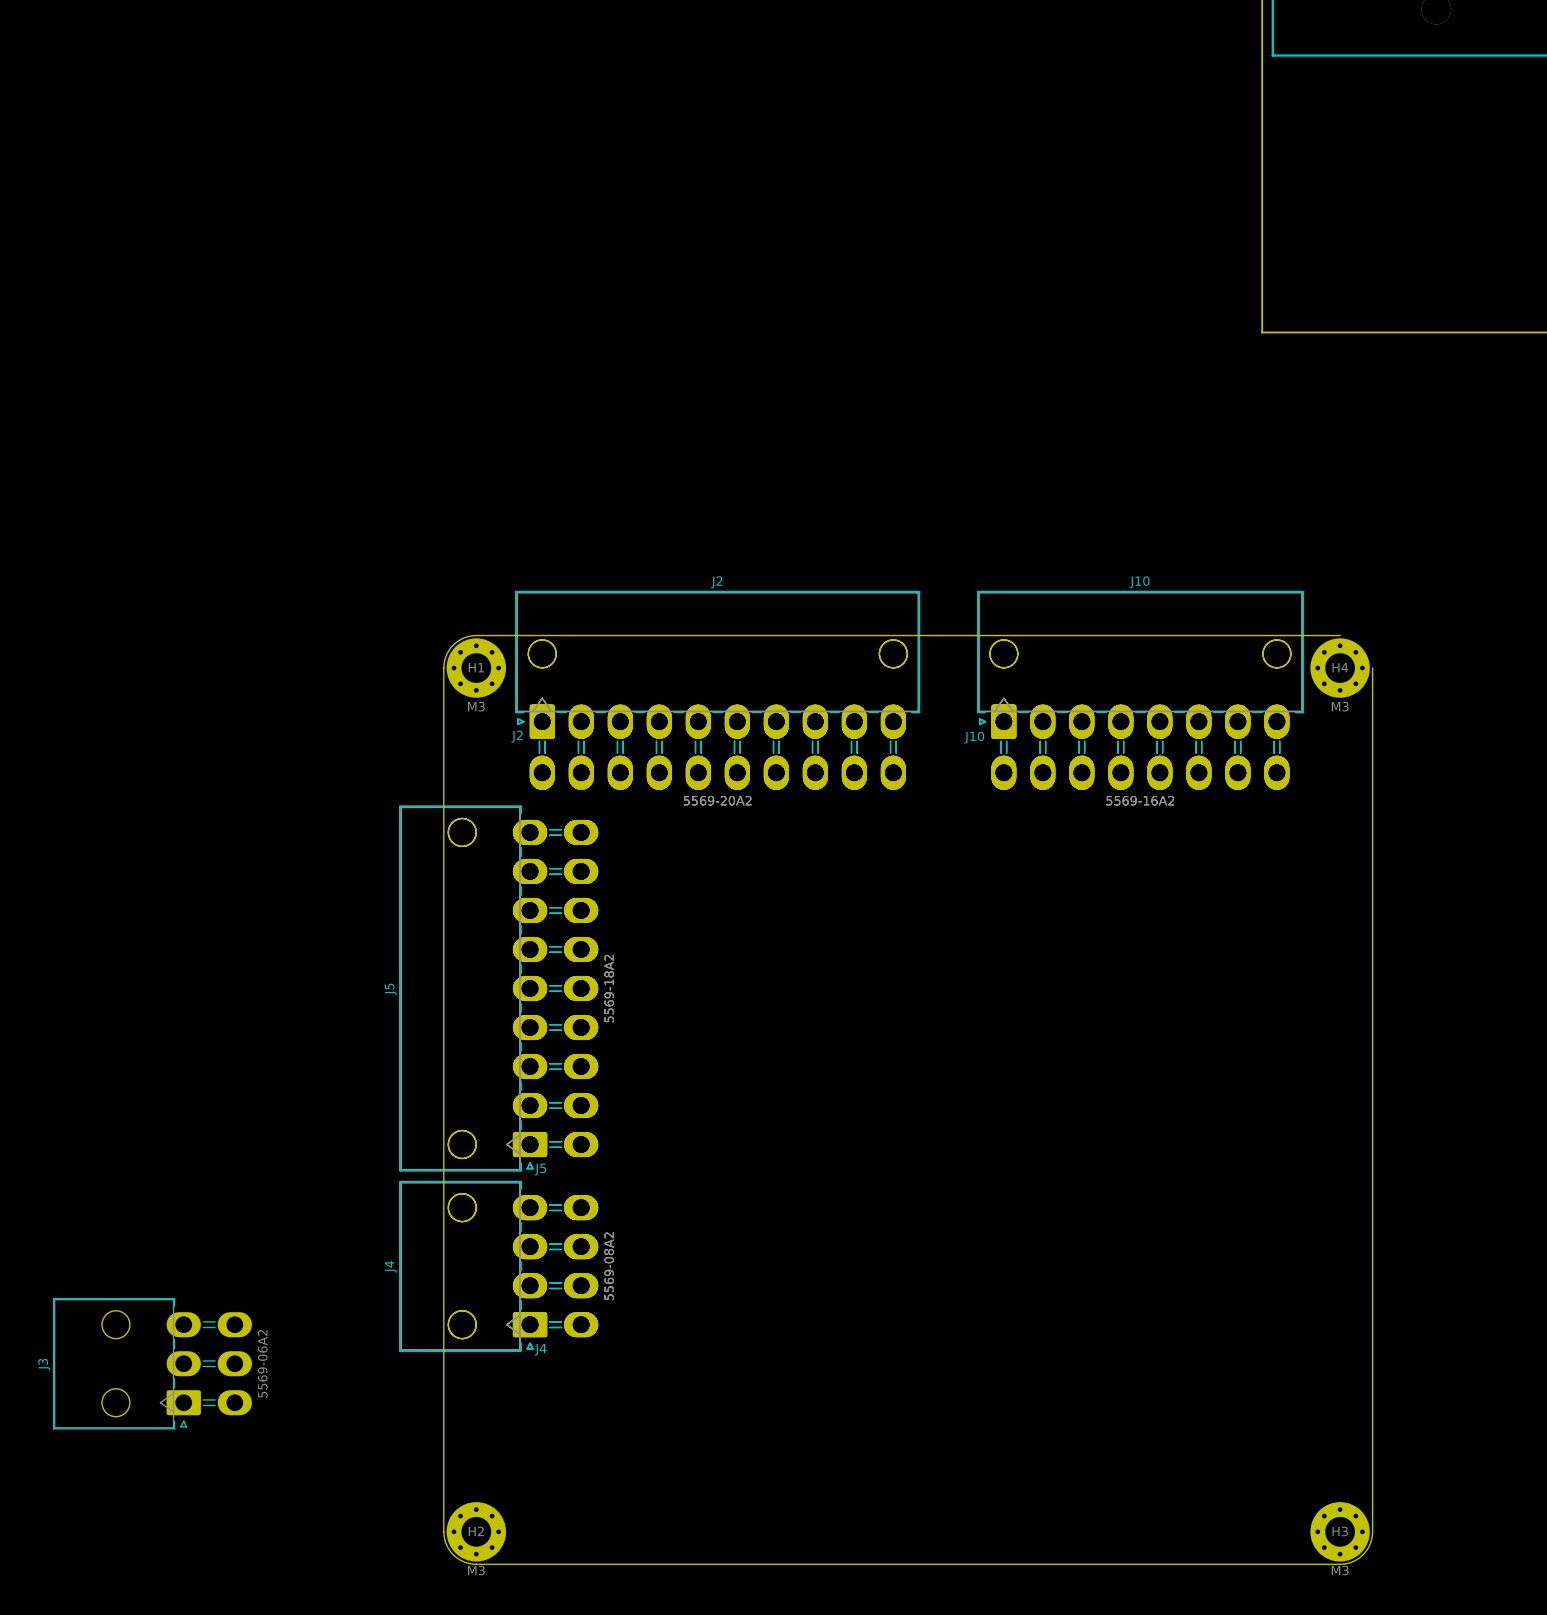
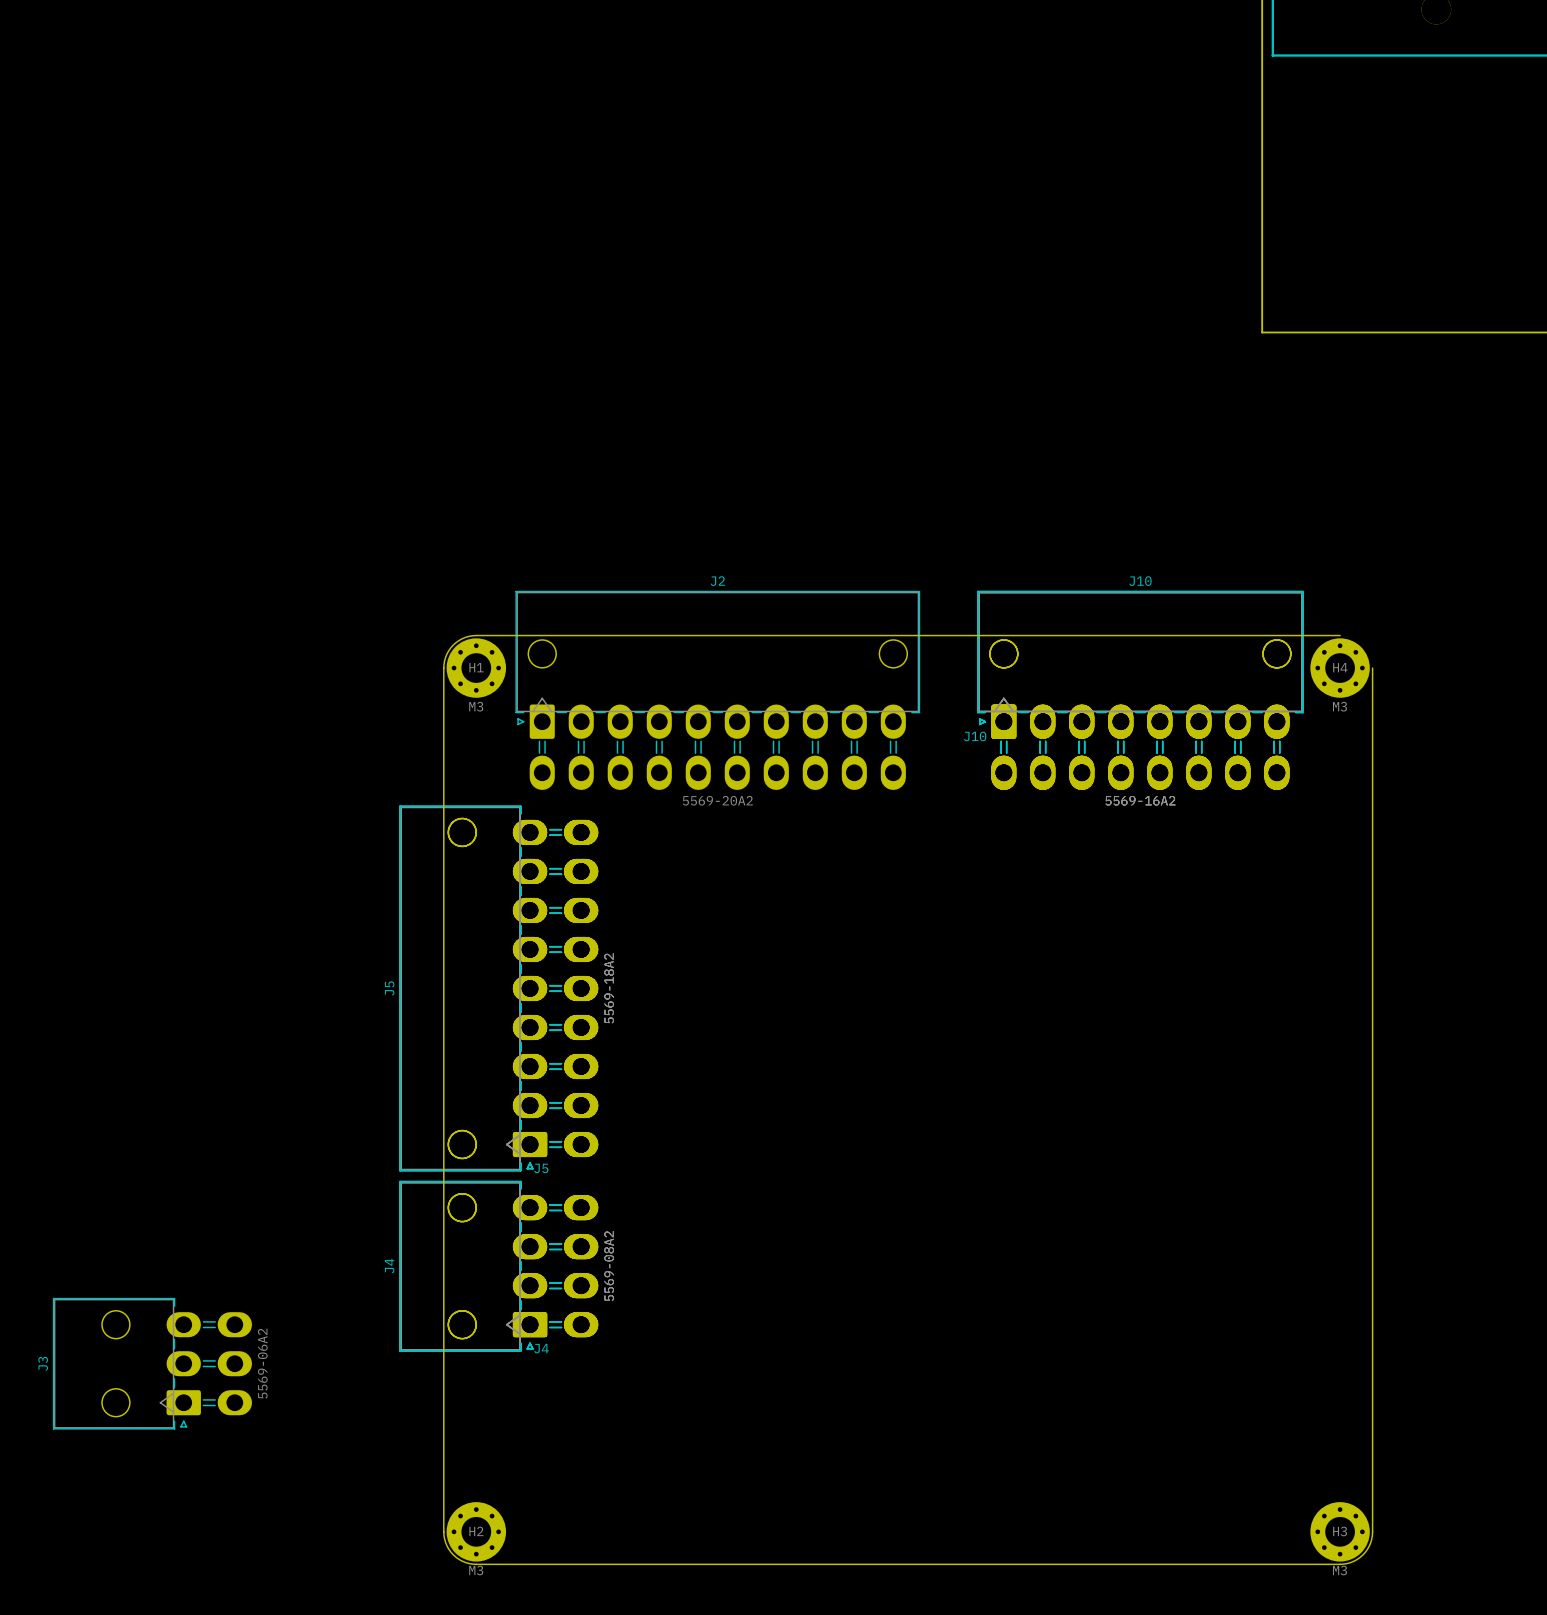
J2: 5569-20A2 (717, 690) -> none

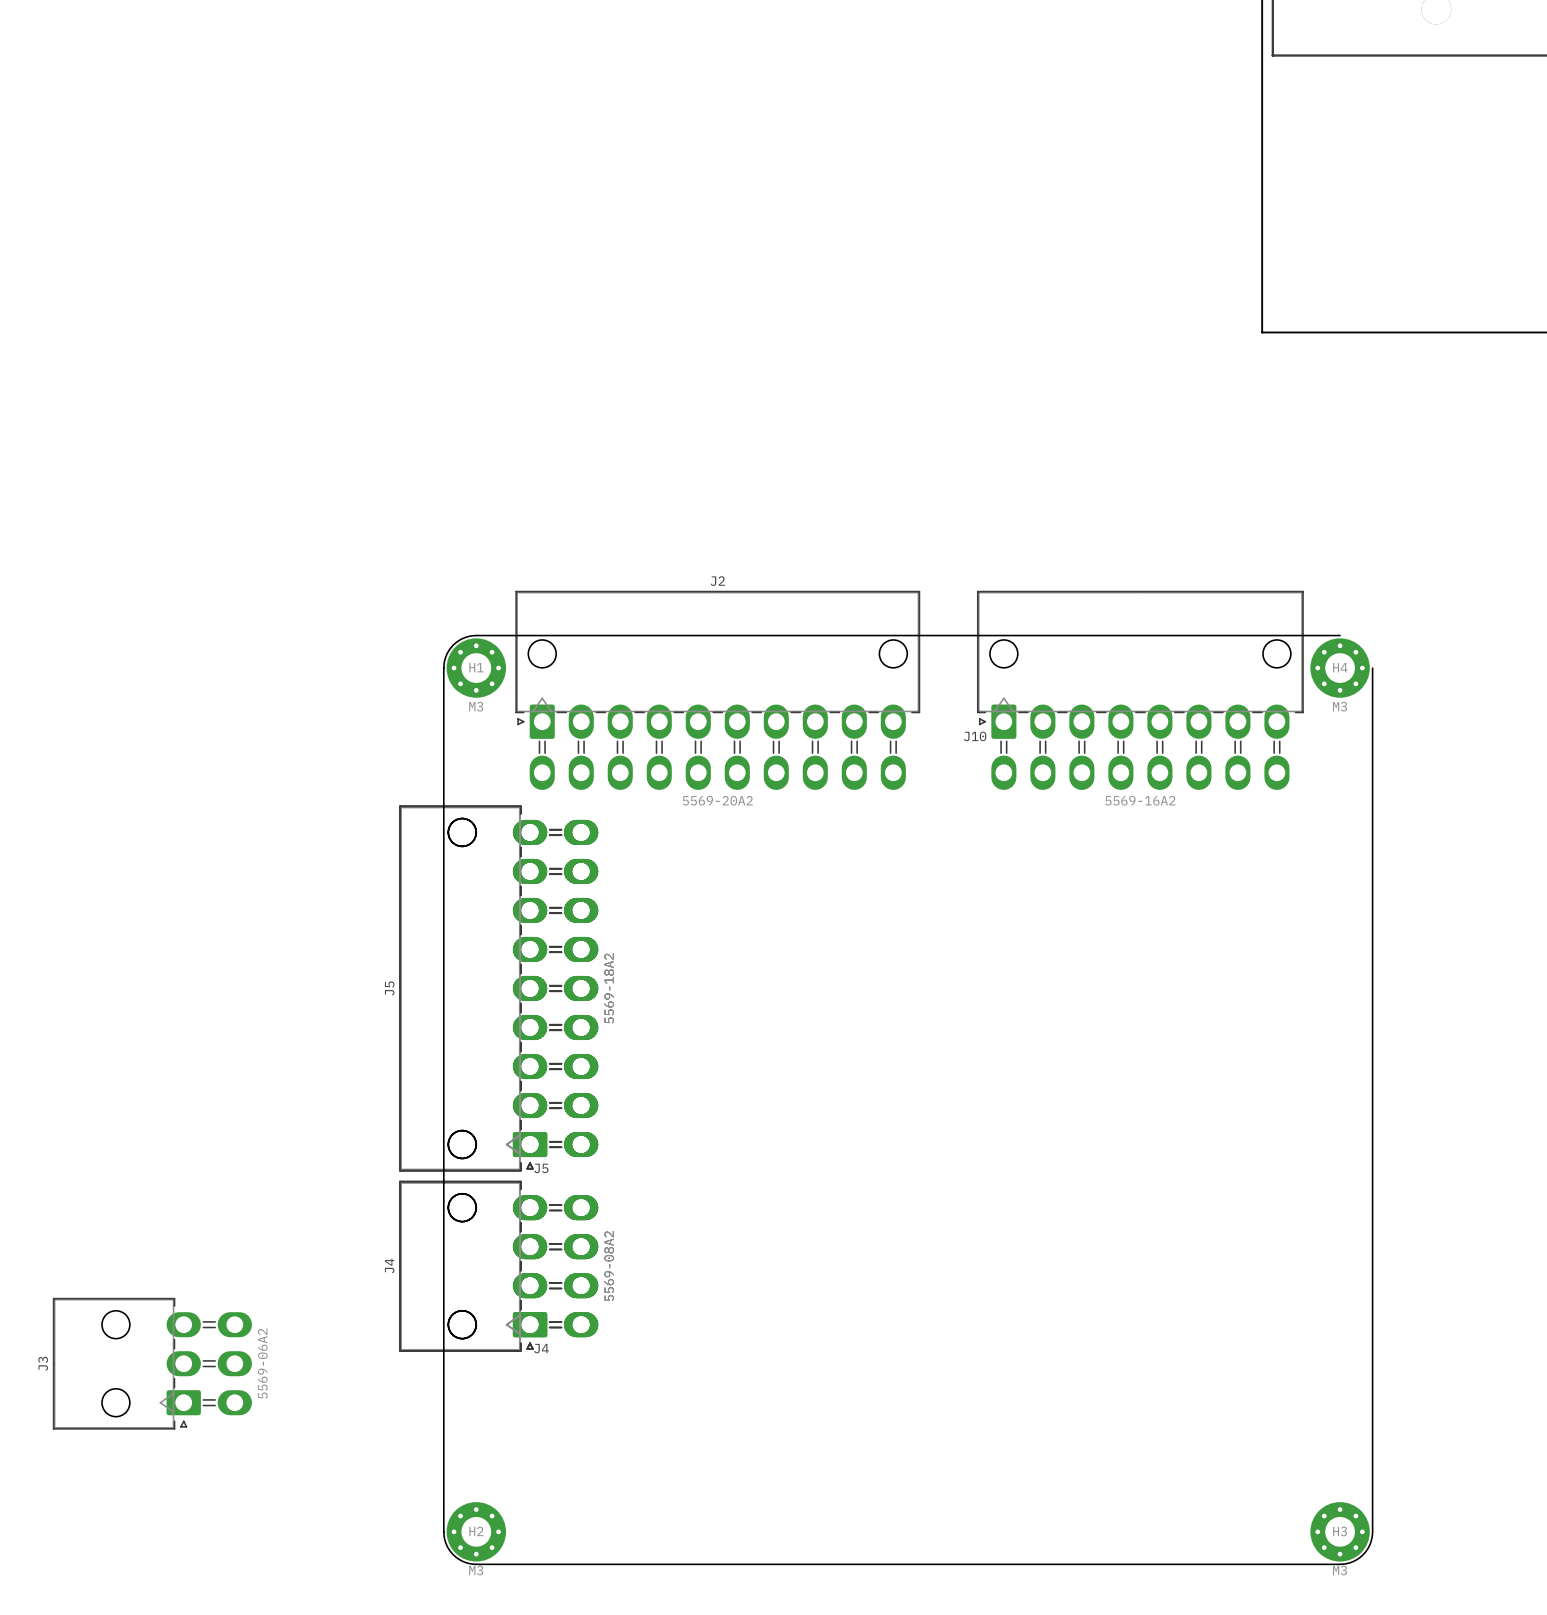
J10: 5569-16A2 (1140, 690) -> none

